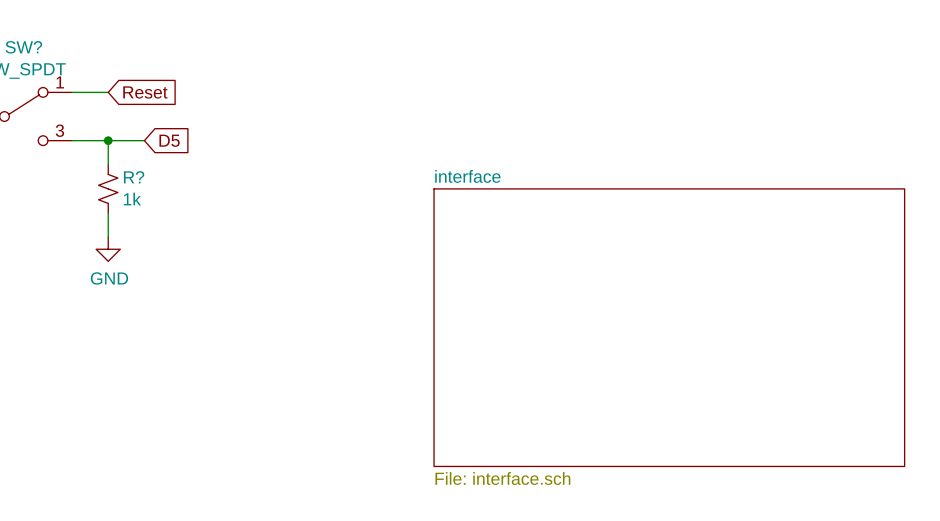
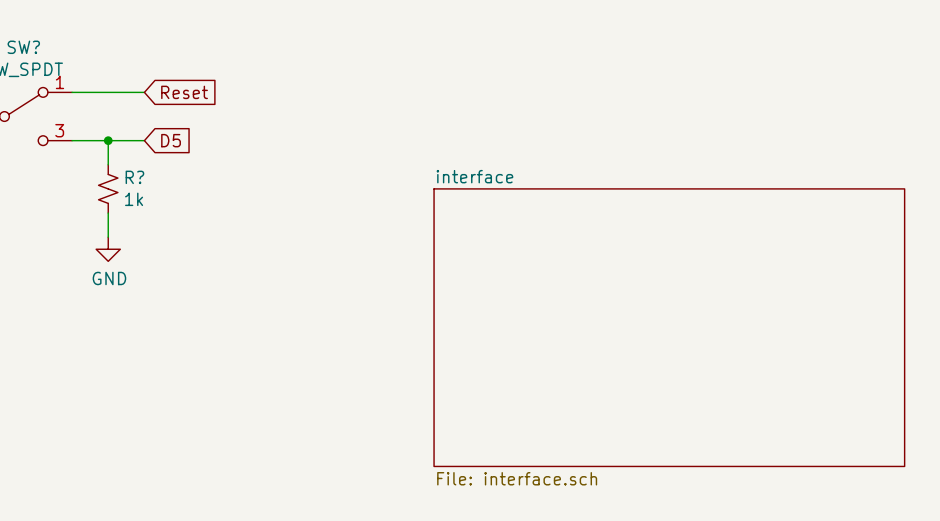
wire: none -> (108, 92) (144, 92)
global label position: Reset (145, 92) -> Reset (184, 92)

